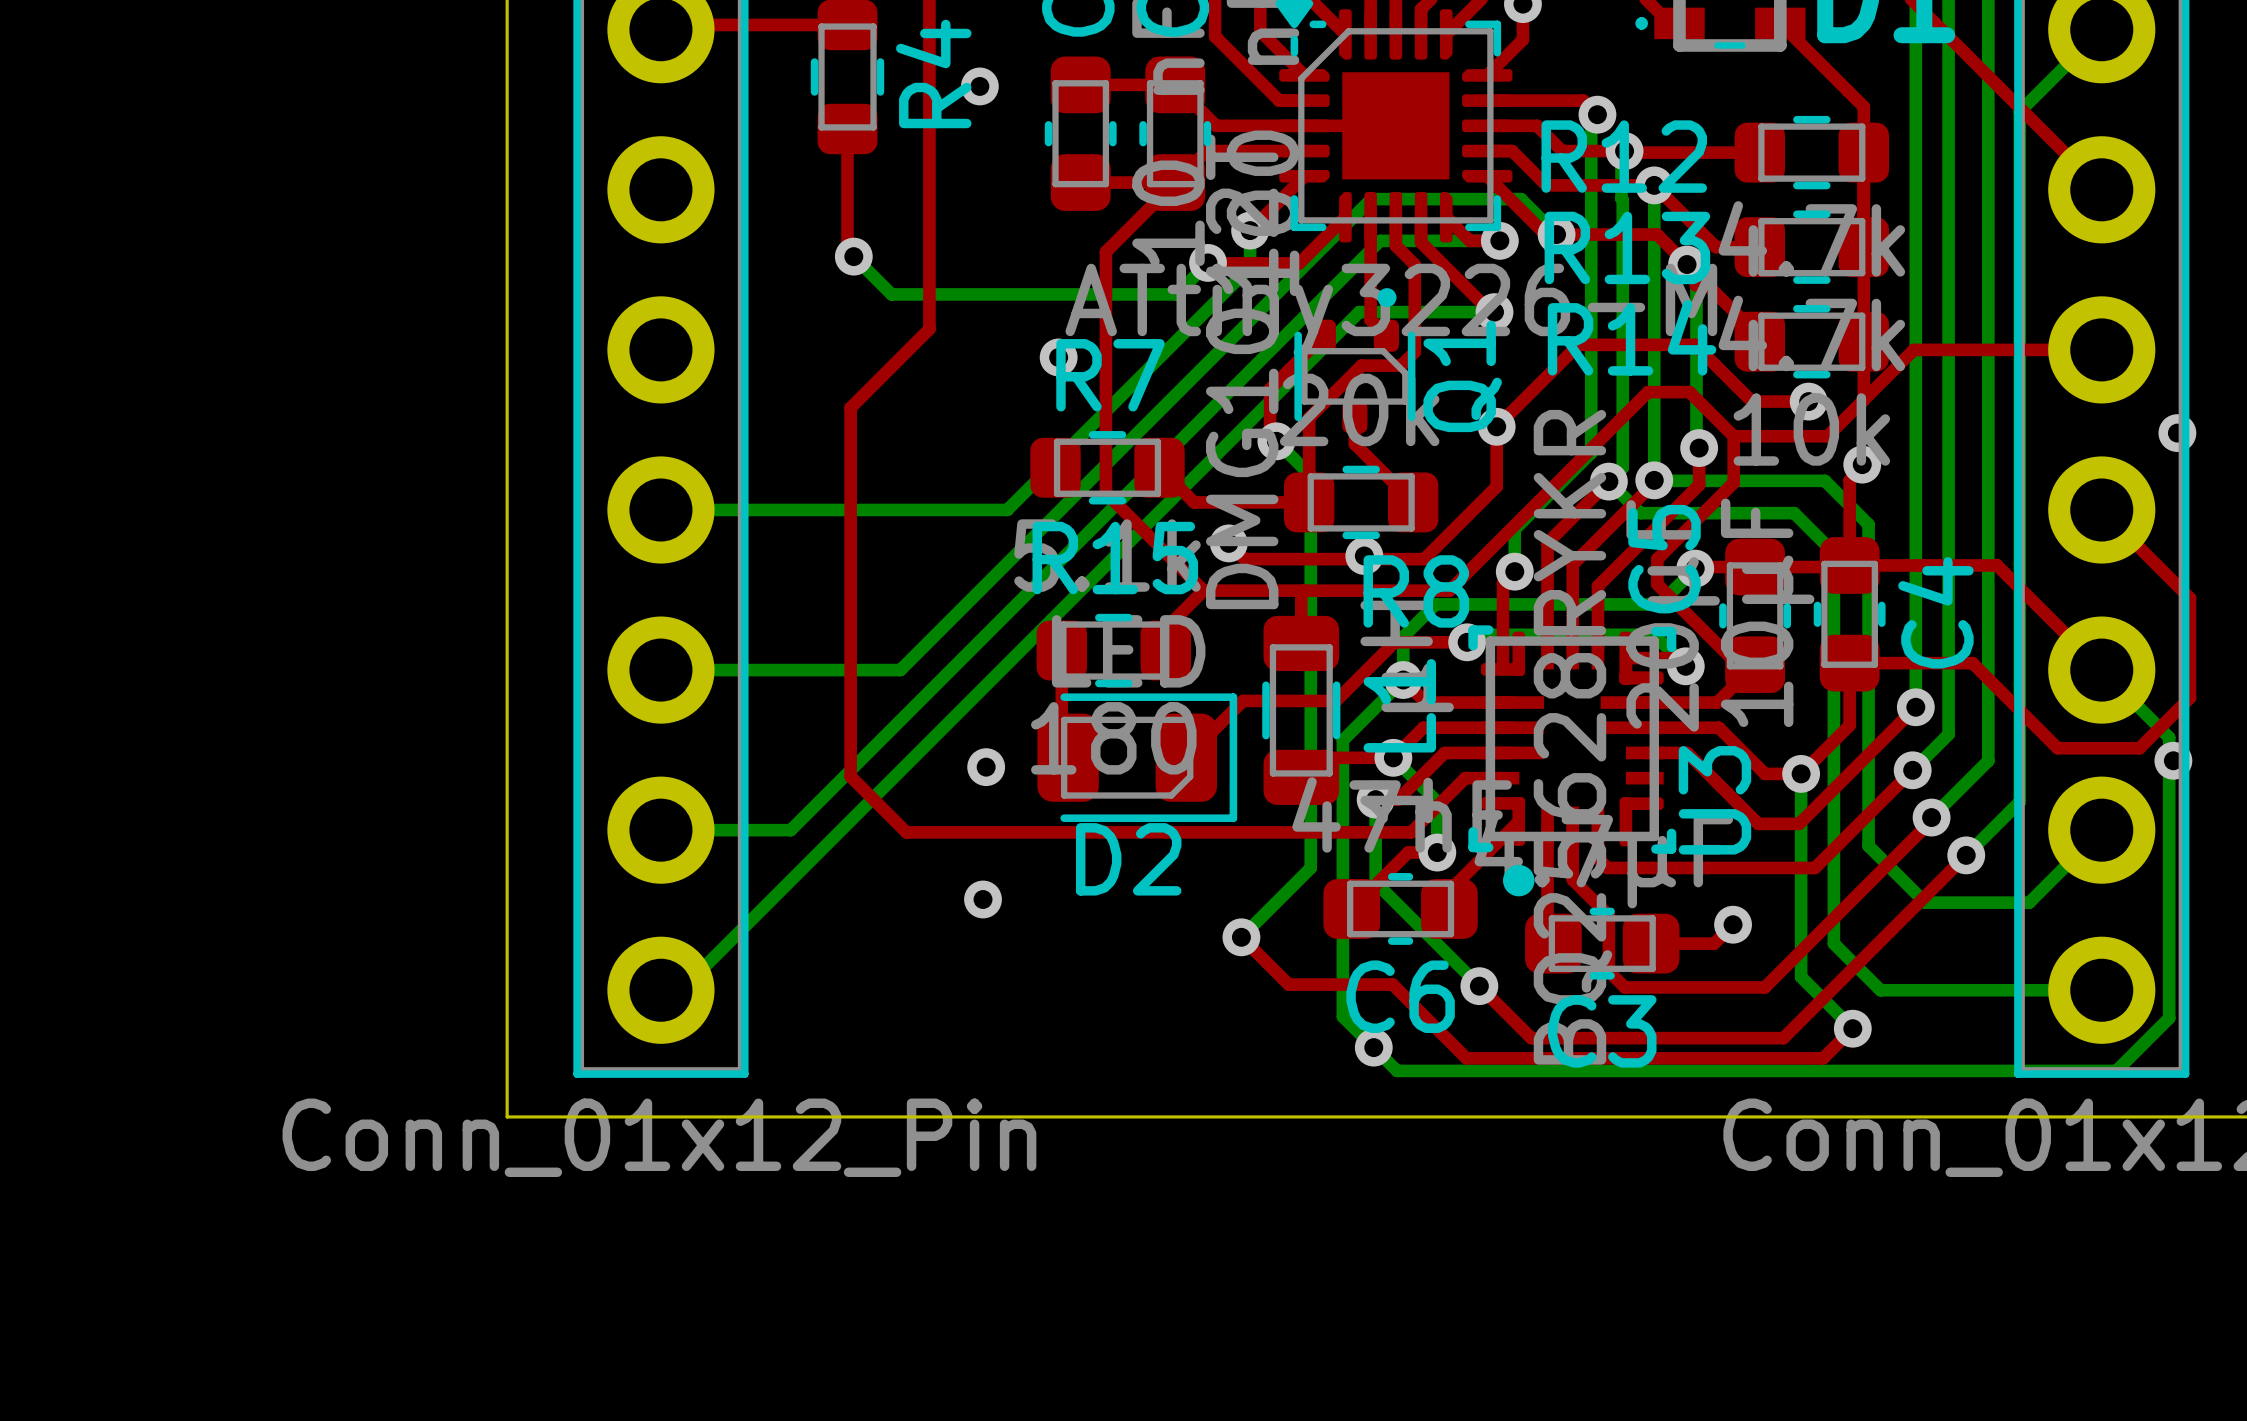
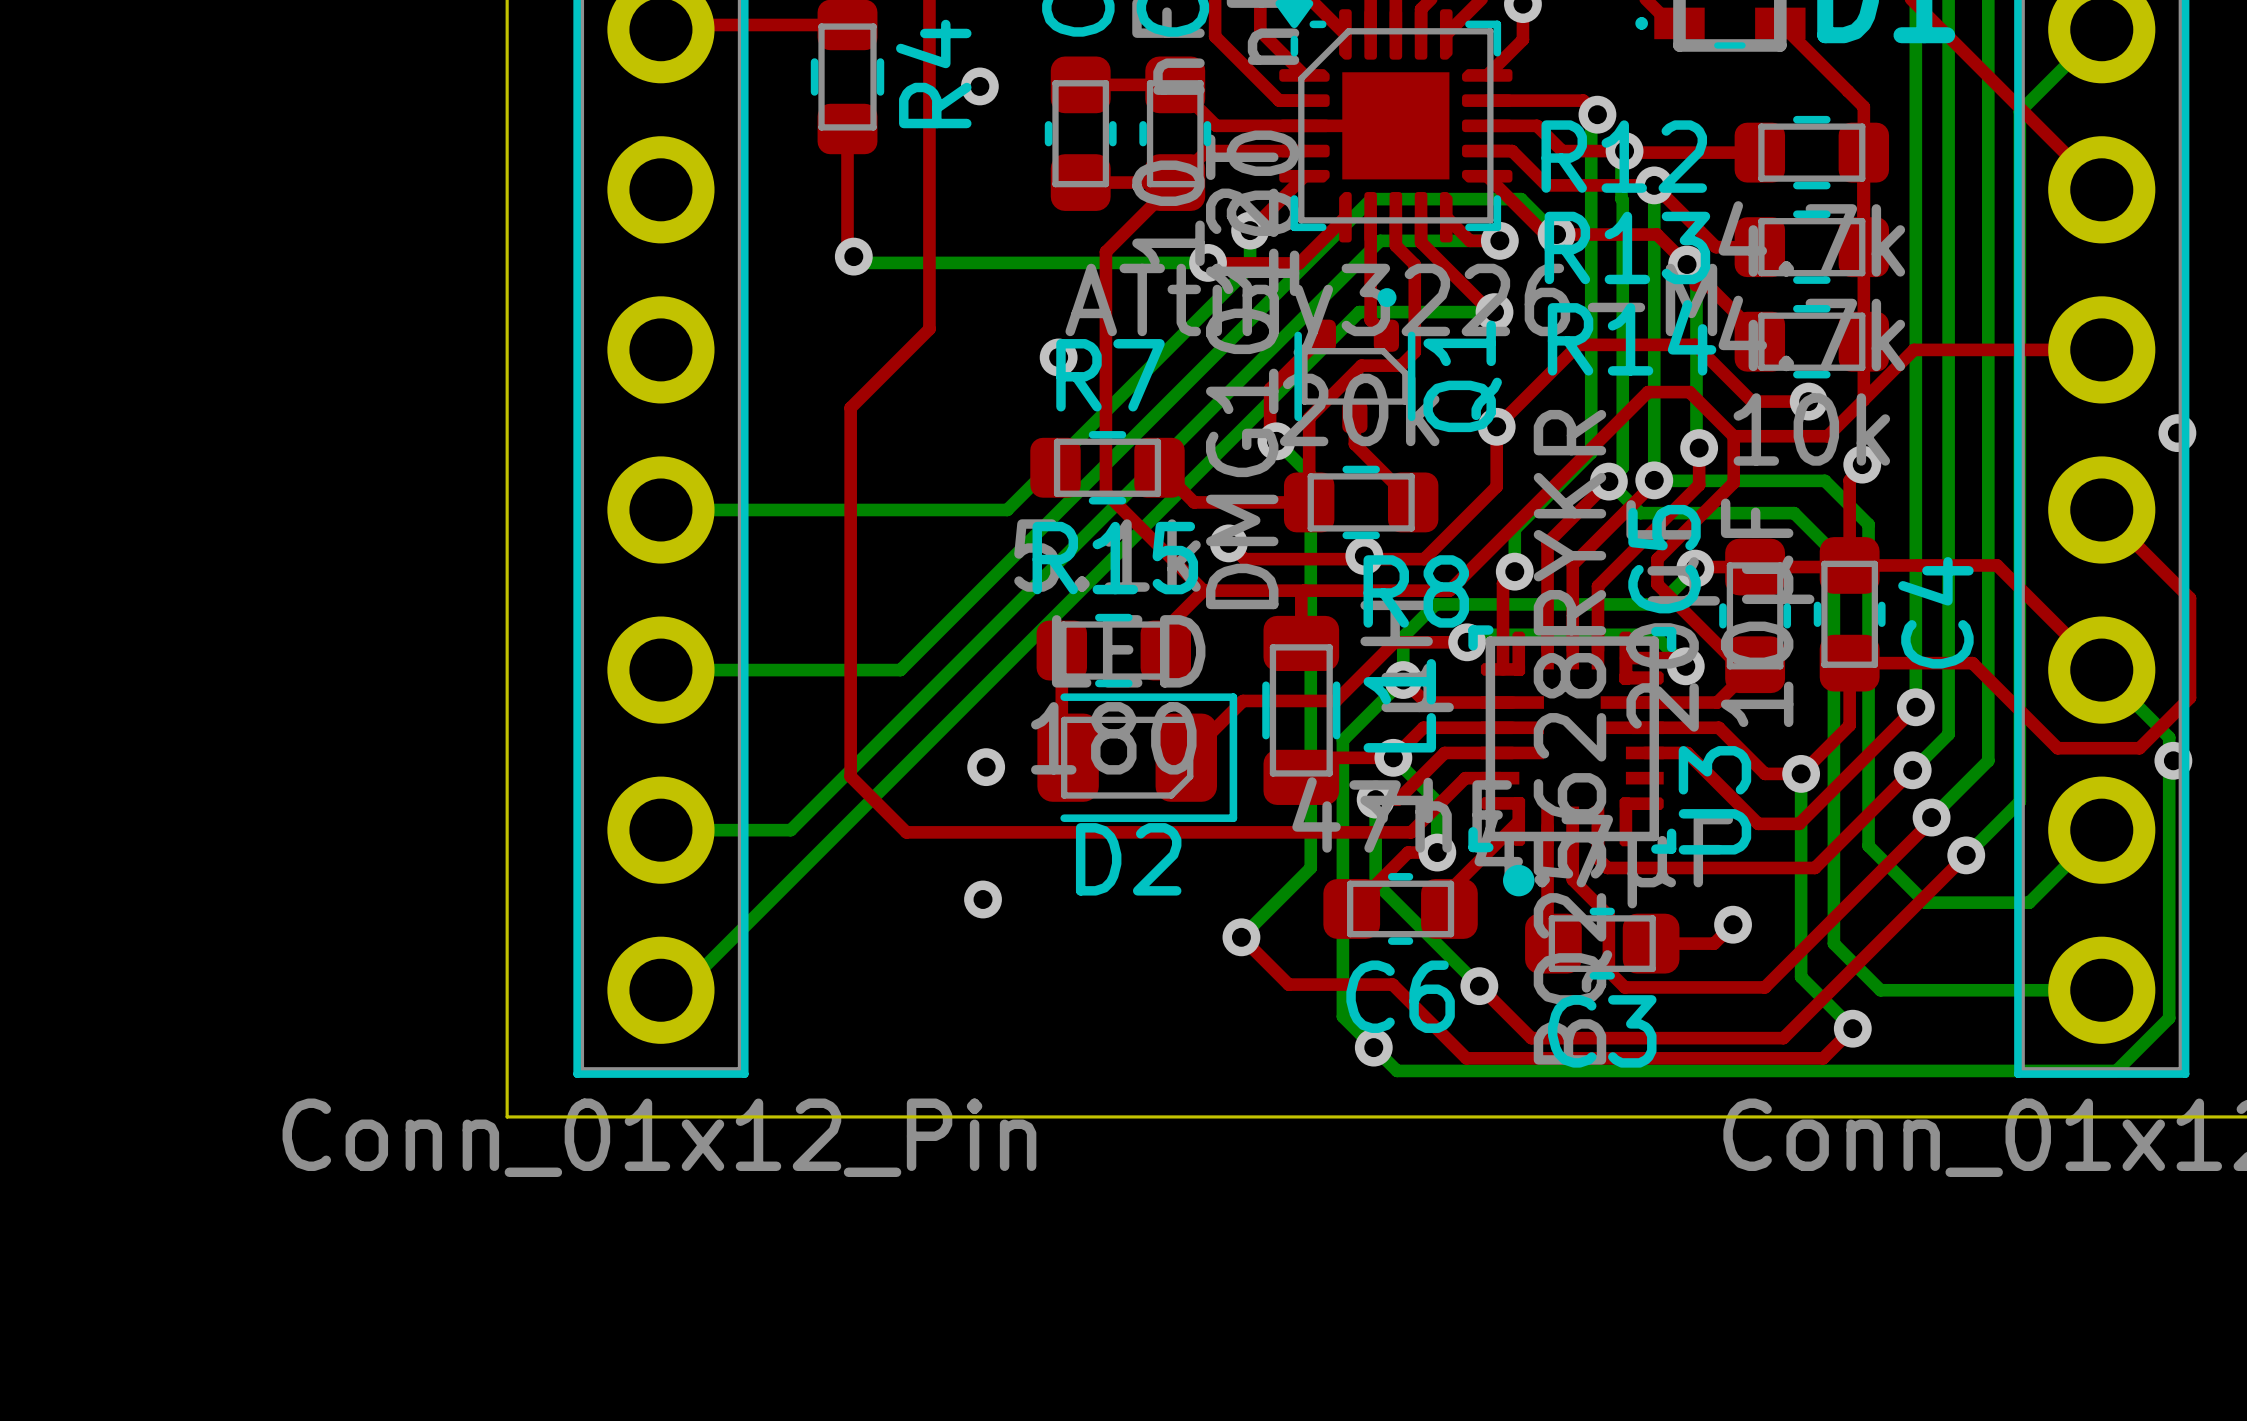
bottom track: (860, 262) (891, 294) (1176, 294) (1208, 262) -> (860, 262) (1208, 262)

